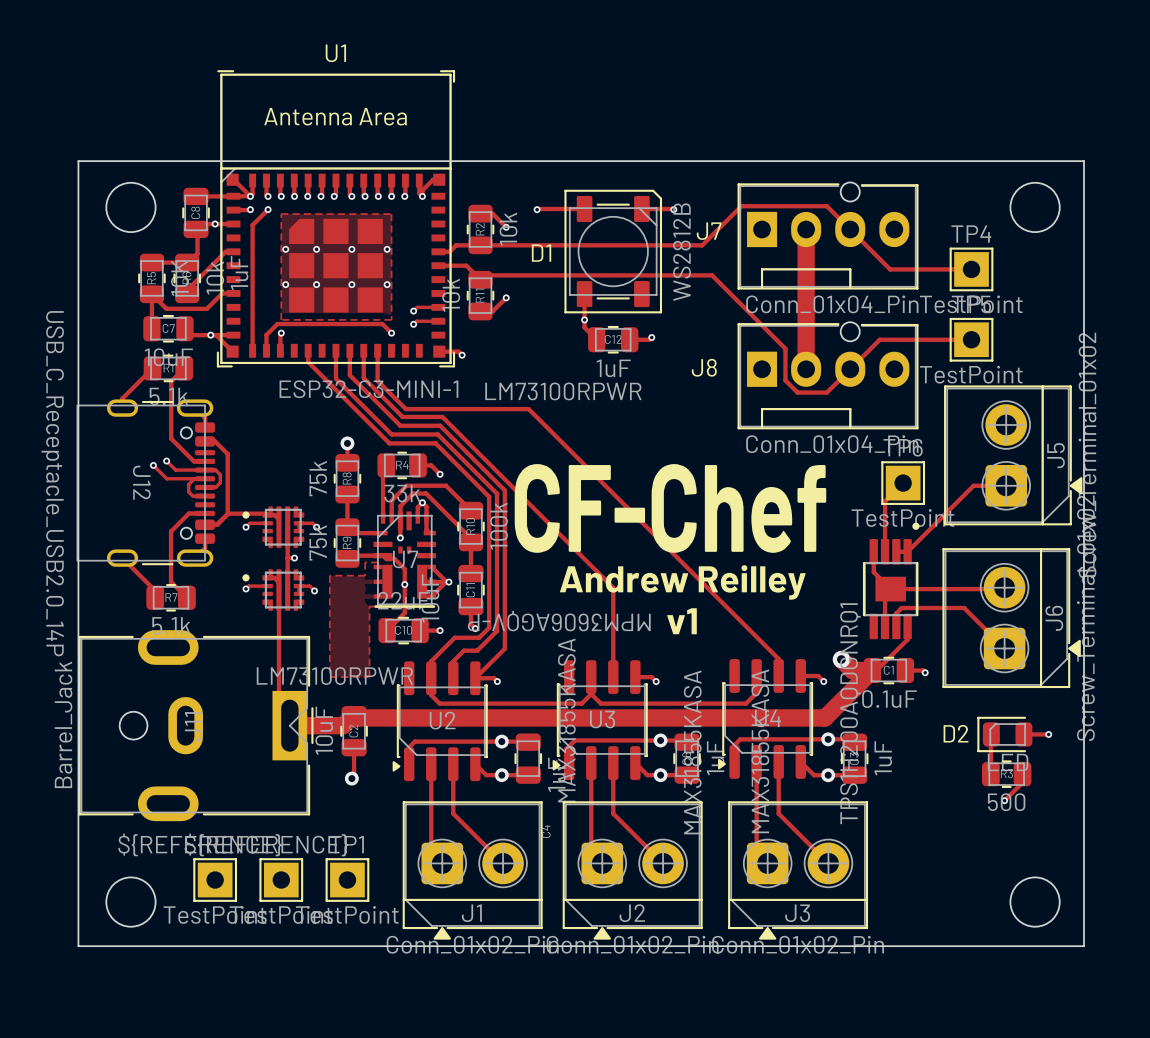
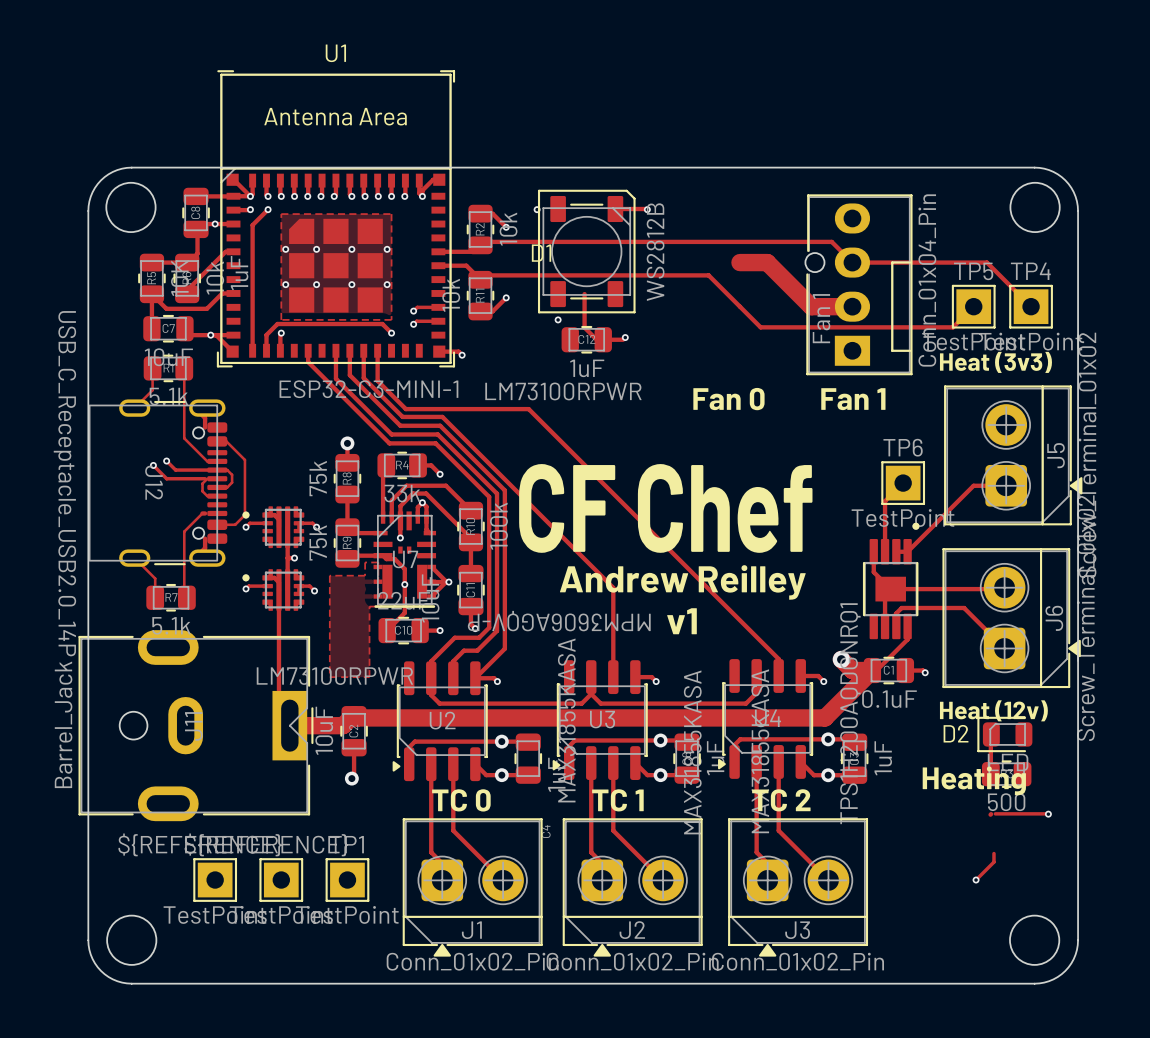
board edge: (78, 161) (1083, 161) (1083, 946) (78, 946) (78, 161) -> (131, 167) (117, 170) (101, 180) (92, 192) (88, 211) (88, 940) (92, 959) (104, 974) (117, 981) (131, 983) (1034, 983) (1053, 979) (1068, 967) (1075, 954) (1078, 940) (1078, 211) (1073, 192) (1061, 177) (1048, 170) (1034, 167) (131, 167)
track: (537, 209) (584, 209) -> none
track: none -> (615, 209) (641, 209)
track: (646, 209) (673, 209) -> none
via position: (673, 209) -> (647, 209)
track: (806, 229) (806, 369) -> none
J7: Conn_01x04_Pin (828, 236) -> none
track: (449, 251) (456, 245) (702, 245) (741, 206) (826, 206) (890, 269) (971, 269) -> (449, 251) (474, 251) (483, 241) (831, 241) (852, 262) (986, 262) (1031, 306)
D1 position: (613, 251) -> (586, 251)
track: none -> (739, 262) (767, 262) (811, 306) (852, 306)
TP4 position: (971, 269) -> (1031, 306)
track: (708, 275) (712, 275) (785, 348) (785, 380) (797, 392) (826, 392) (879, 339) (971, 339) -> (708, 275) (760, 327) (953, 327) (973, 306)
Fan 1: none -> Conn_01x04_Pin (858, 284)
via: none -> (558, 319)
via: (584, 319) -> none
via: none -> (625, 337)
track: (651, 337) (649, 339) (629, 339) -> none
via: (651, 337) -> none
track: none -> (603, 339) (623, 339)
C12 position: (613, 339) -> (586, 339)
TP5 position: (971, 339) -> (973, 306)
text: none -> Heat (3v3) (995, 362)
track: (152, 368) (122, 398) (122, 408) -> (152, 368) (152, 390) (134, 408)
track: (184, 368) (171, 381) (171, 438) (193, 461) (205, 461) -> (184, 368) (184, 438) (207, 461) (217, 461)
J8: Conn_01x04_Pin (828, 375) -> none
text: none -> Fan 0 (728, 399)
text: none -> Fan 1 (853, 399)
track: (205, 441) (215, 441) (227, 454) (227, 514) (217, 524) (205, 524) -> none
track: (215, 470) (220, 474) (220, 482) (215, 487) (205, 487) -> (215, 470) (227, 470) (232, 474) (232, 482) (227, 487) (217, 487)
track: (194, 478) (188, 484) (188, 491) (192, 496) (205, 496) -> none
track: none -> (207, 478) (202, 483) (202, 491) (207, 496) (217, 496)
J12 position: (145, 483) -> (158, 483)
text: CF-Chef (670, 508) -> CF Chef (665, 508)
track: (202, 513) (189, 513) (171, 531) (171, 581) (184, 595) -> (202, 513) (184, 531) (184, 595)
track: (266, 513) (228, 513) (216, 524) -> (217, 441) (226, 441) (244, 459) (244, 515) (235, 524) (217, 524)
track: (122, 558) (155, 590) -> (134, 558) (155, 578) (155, 590)
text: none -> Heat (12v) (993, 710)
track: (1023, 734) (1048, 734) -> none
via: (1048, 734) -> none
track: (1022, 774) (1022, 782) (1004, 800) -> (993, 853) (993, 862) (976, 880)
text: none -> Heating (974, 780)
text: none -> TC 0 (461, 800)
text: none -> TC 1 (617, 800)
text: none -> TC 2 (781, 800)
via: (1004, 800) -> none
track: (453, 813) (503, 863) -> (453, 813) (453, 830) (503, 880)
track: (613, 813) (663, 863) -> (613, 813) (613, 830) (663, 880)
track: (778, 813) (828, 863) -> (778, 813) (778, 830) (828, 880)
track: none -> (995, 813) (1048, 814)
track: none -> (991, 814) (990, 814)
via: none -> (1048, 814)
J1 position: (472, 870) -> (472, 887)
J2 position: (632, 870) -> (632, 887)
J3 position: (798, 870) -> (798, 887)
via: none -> (976, 880)
round board edge position: (130, 902) -> (131, 940)
round board edge position: (1035, 902) -> (1034, 940)

